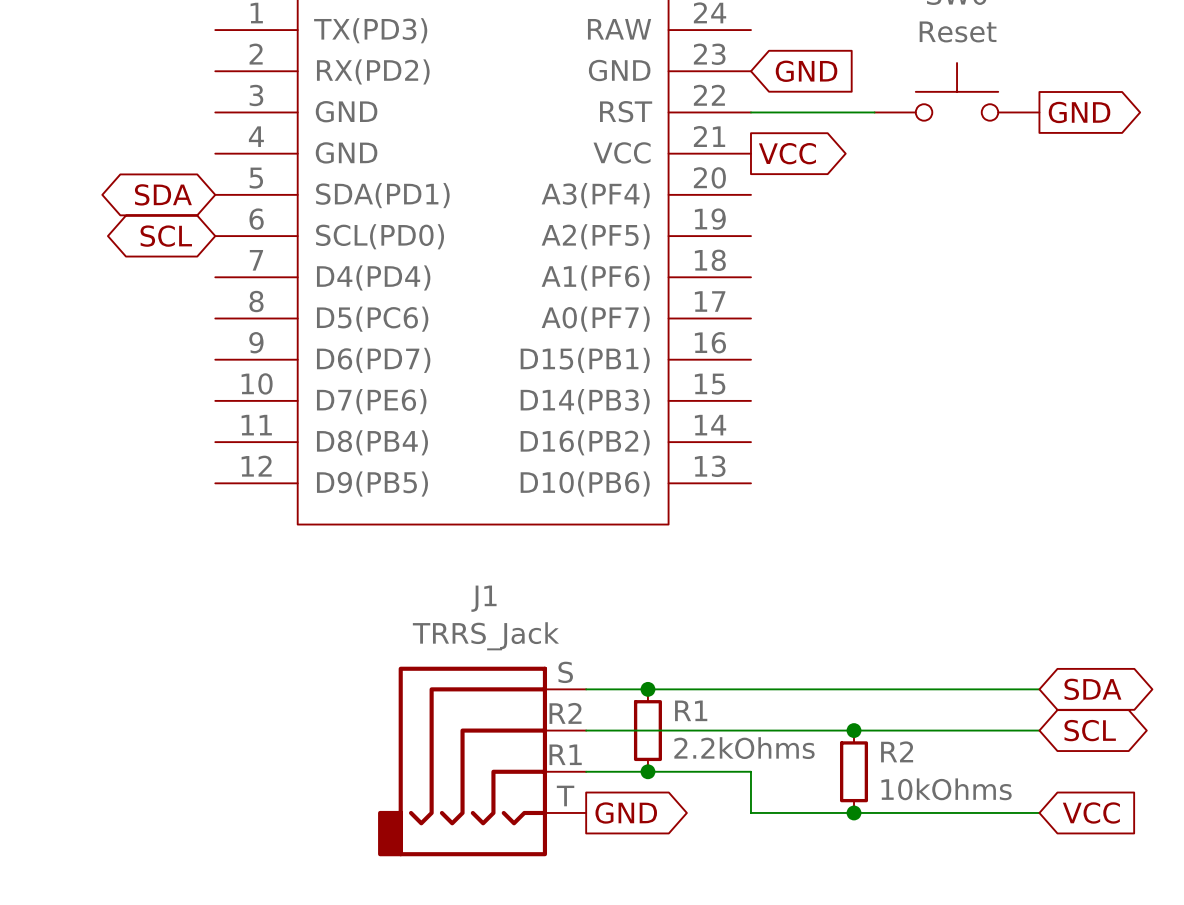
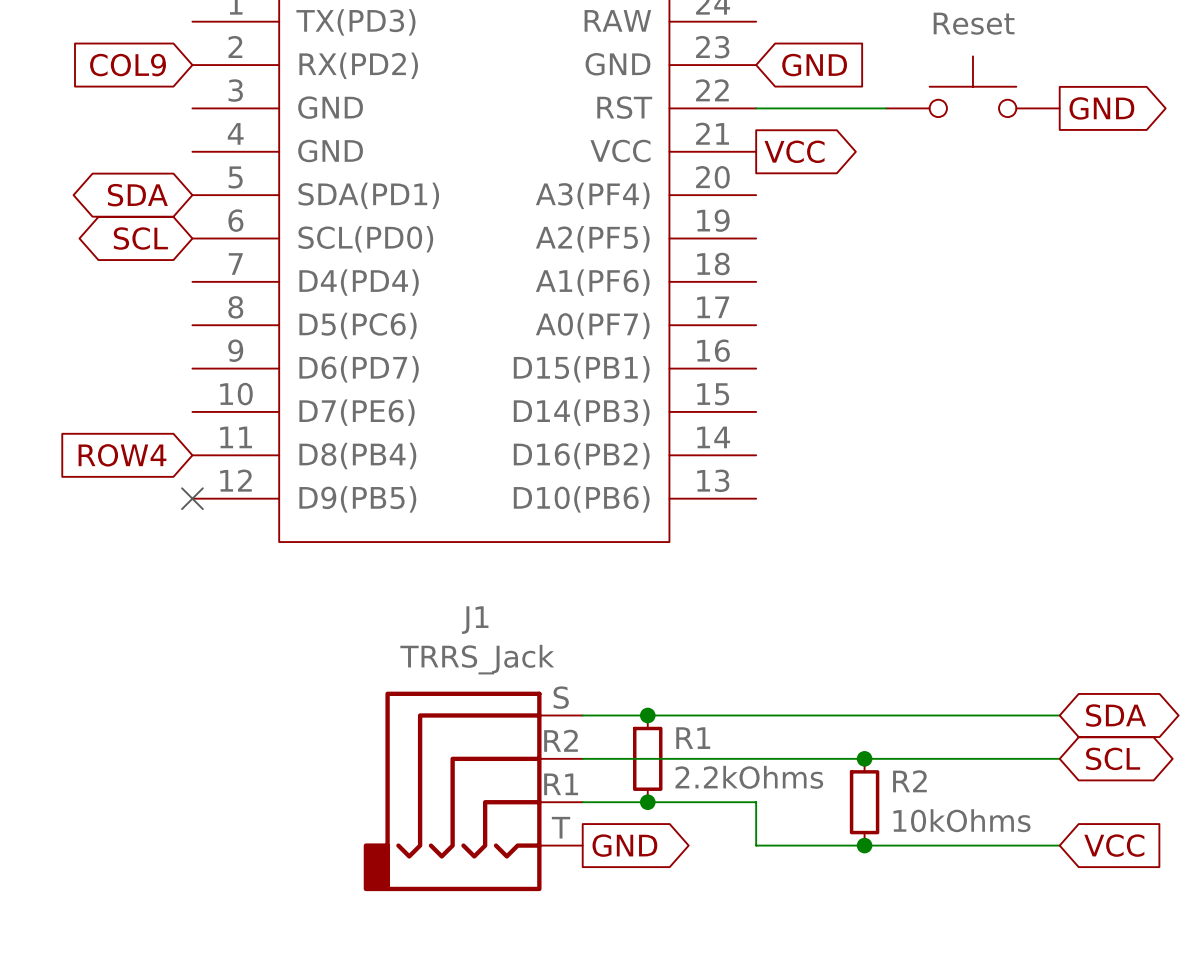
global label: none -> COL9 (128, 65)
global label: none -> ROW4 (122, 455)
no-connect mark: none -> (192, 498)

